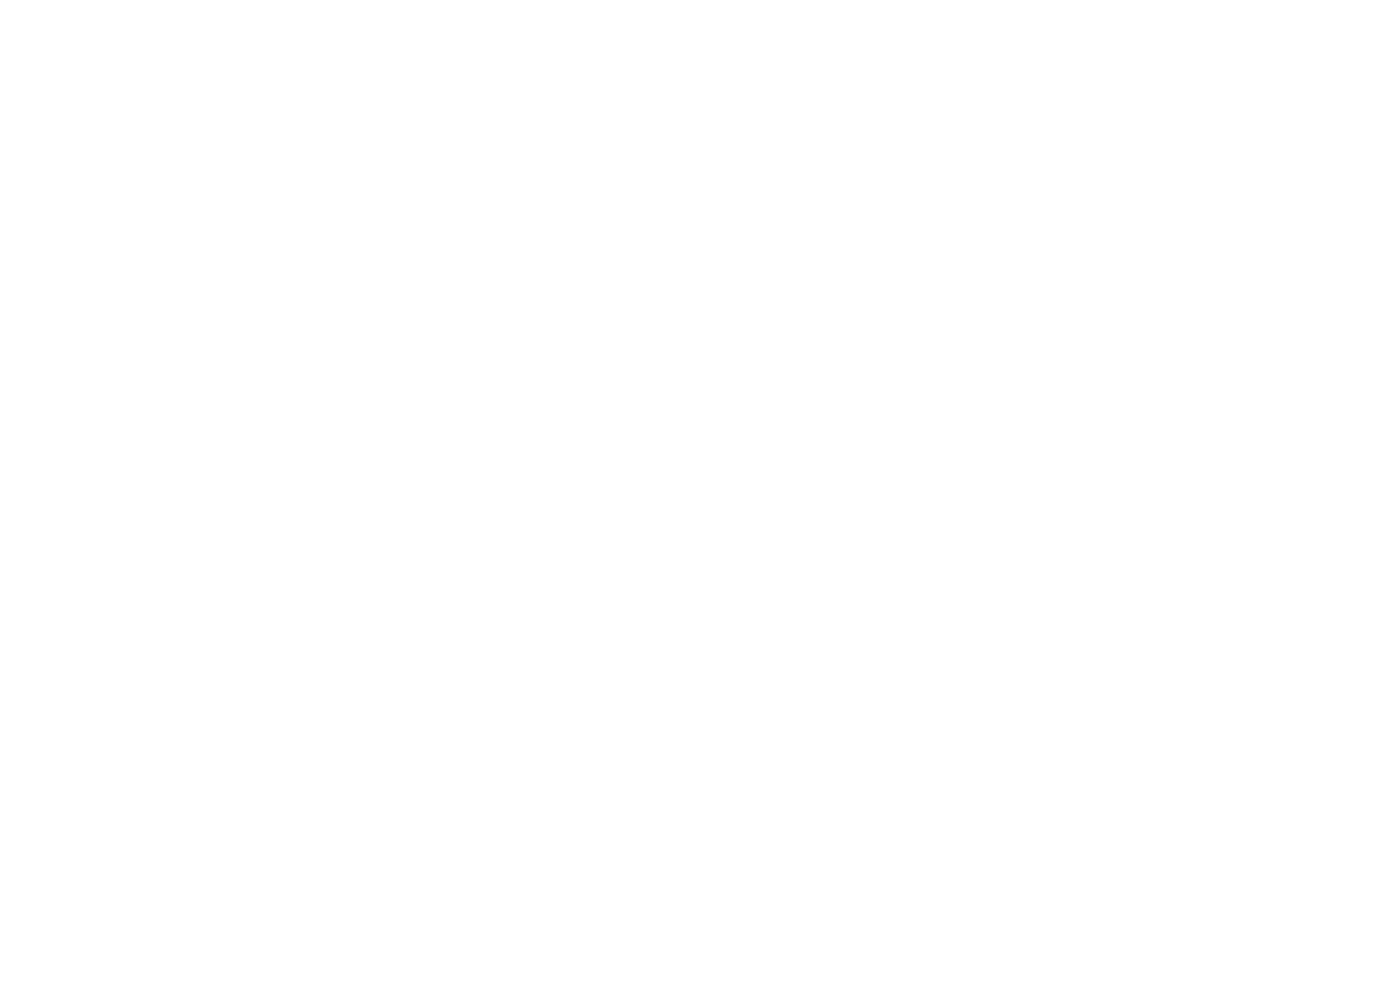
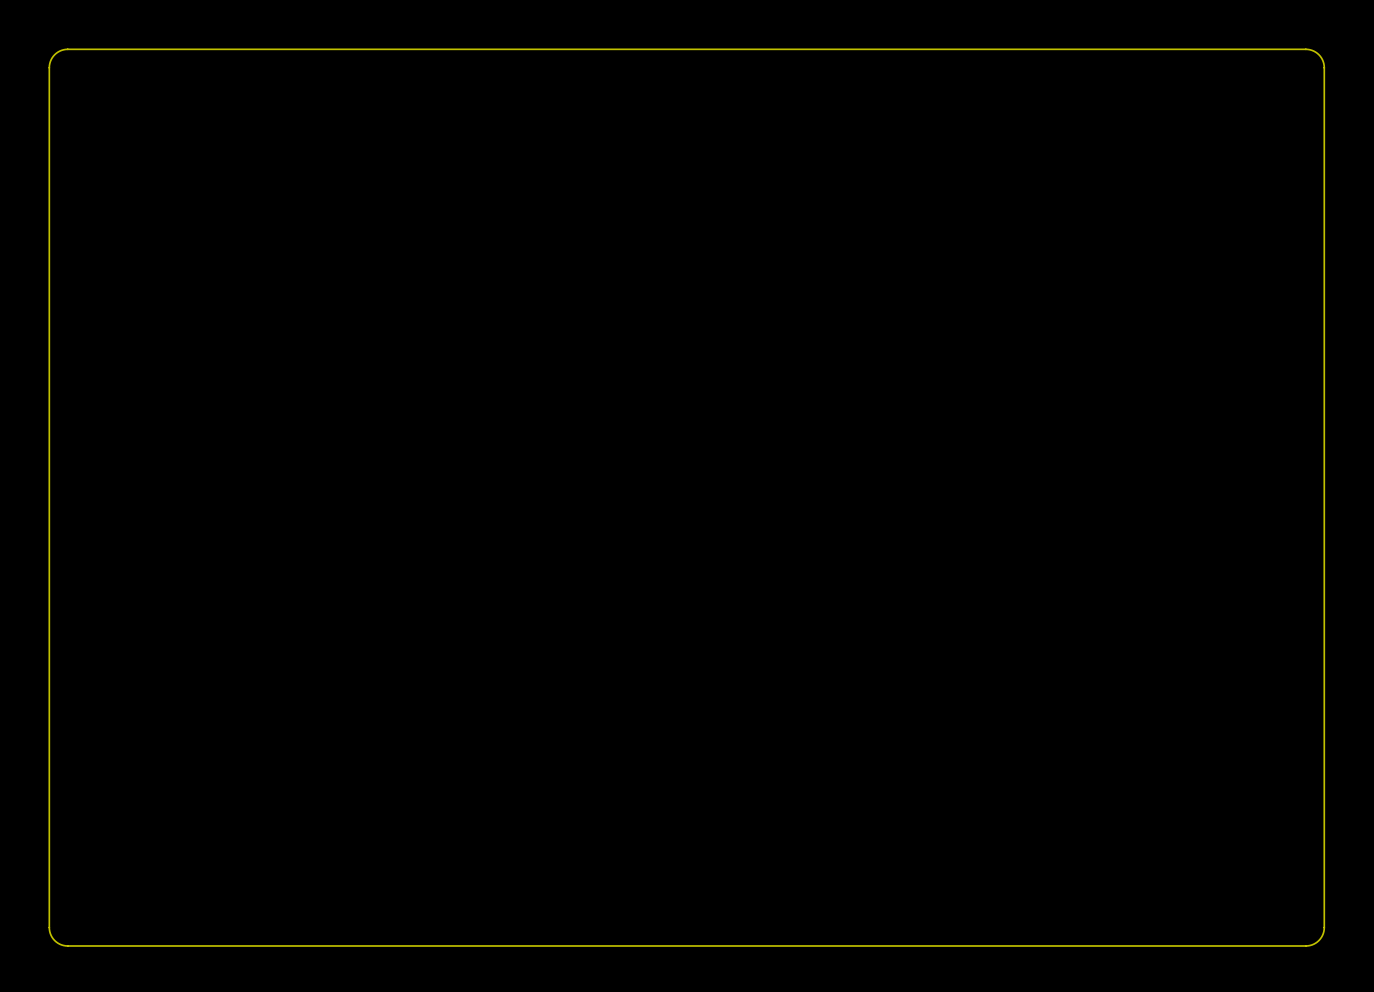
board edge: none -> (67, 49) (1305, 49) (1317, 53) (1322, 59) (1324, 67) (1324, 927) (1320, 939) (1313, 944) (1305, 945) (67, 945) (56, 941) (51, 935) (49, 927) (49, 67) (54, 54) (67, 49)

